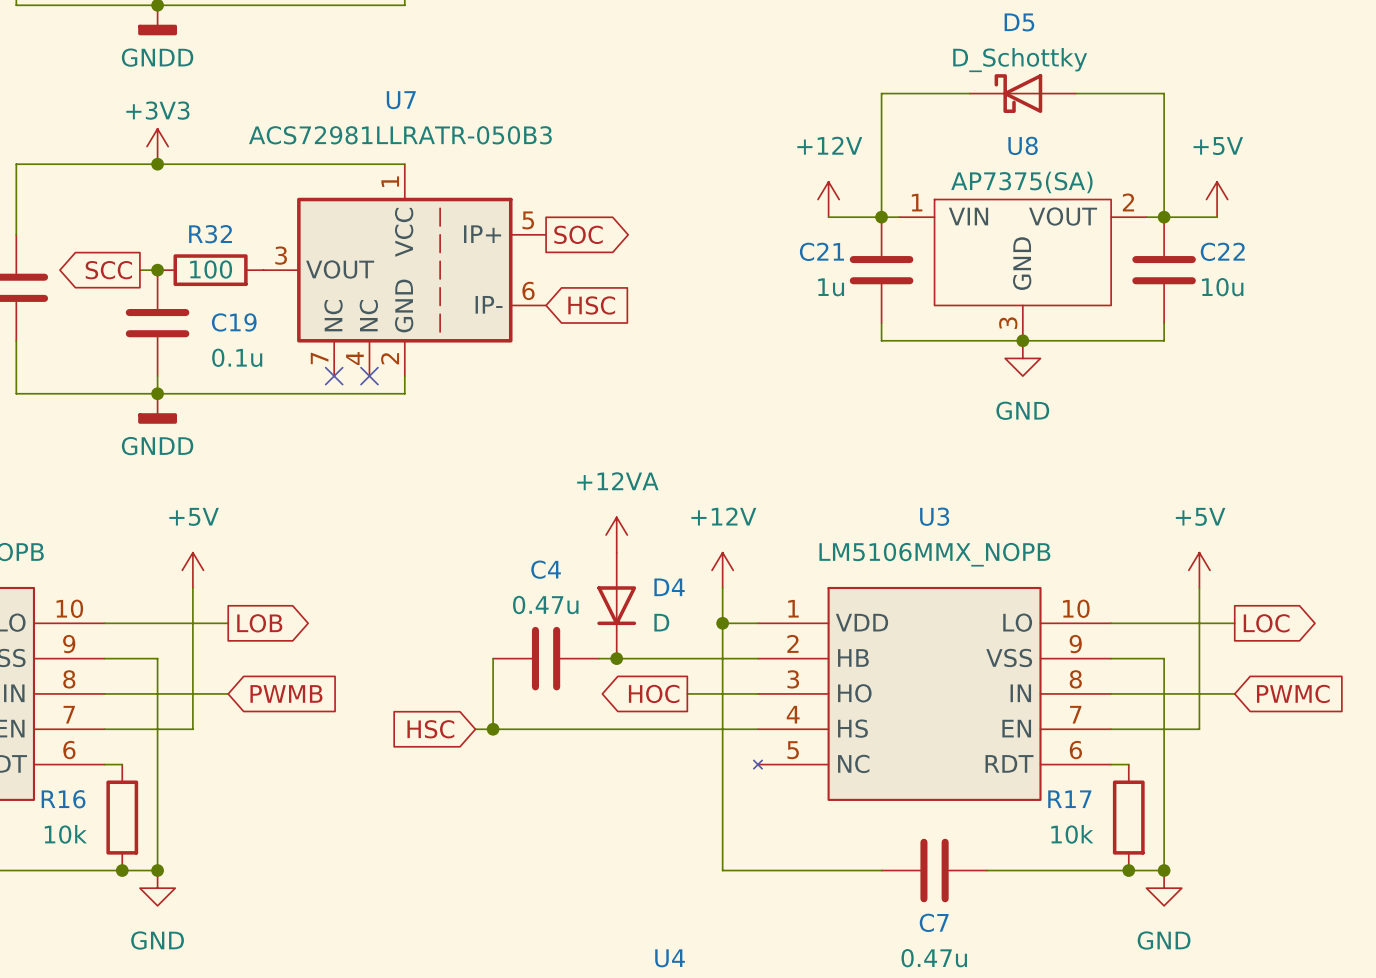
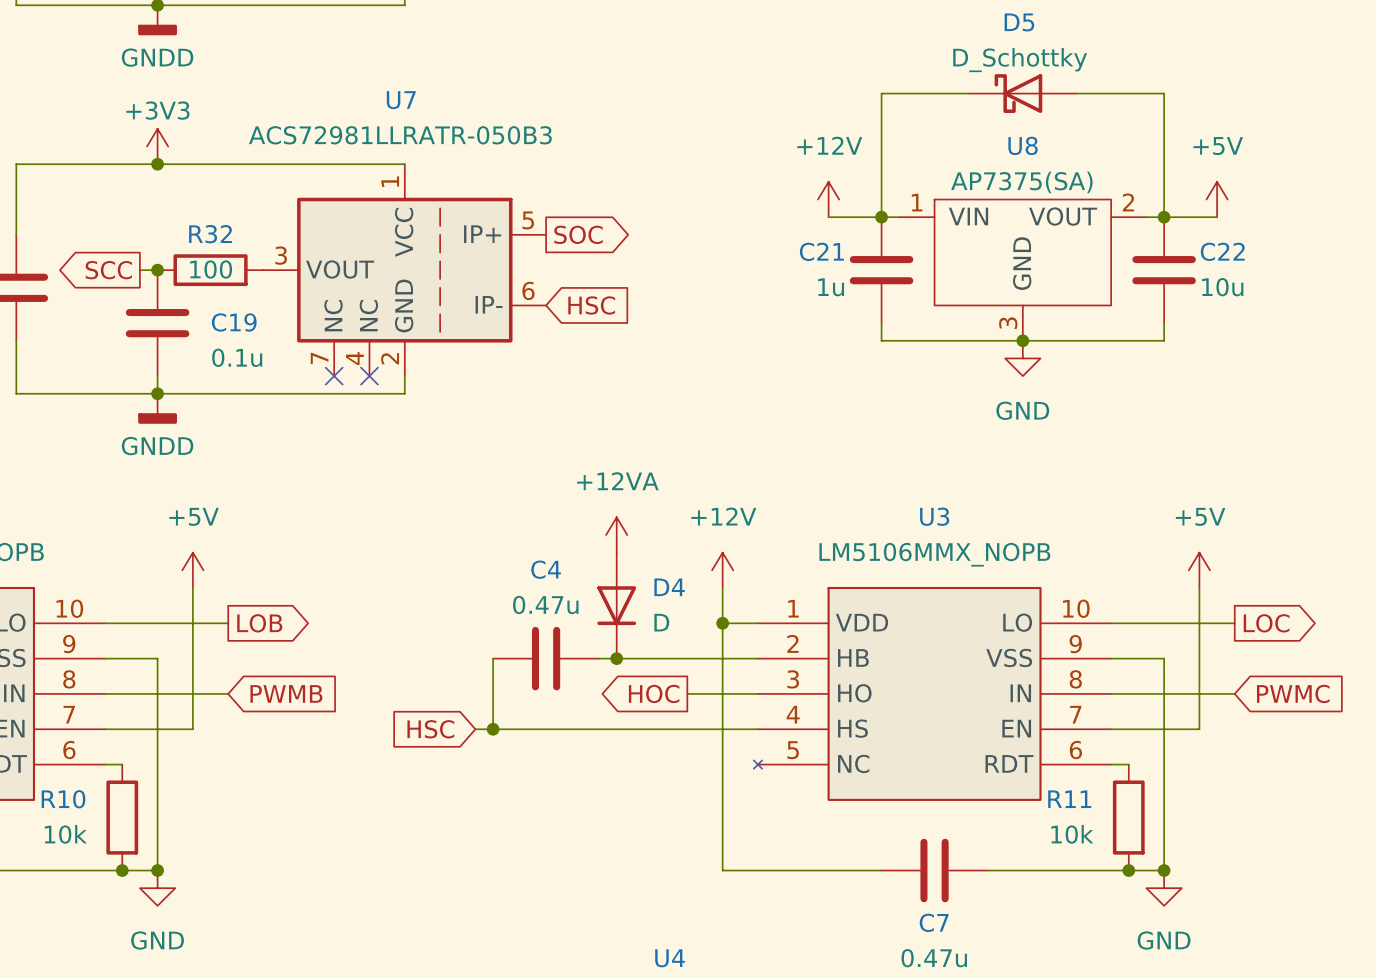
R16 name: R16 (63, 799) -> R10 (63, 799)
R17 name: R17 (1069, 799) -> R11 (1069, 799)

